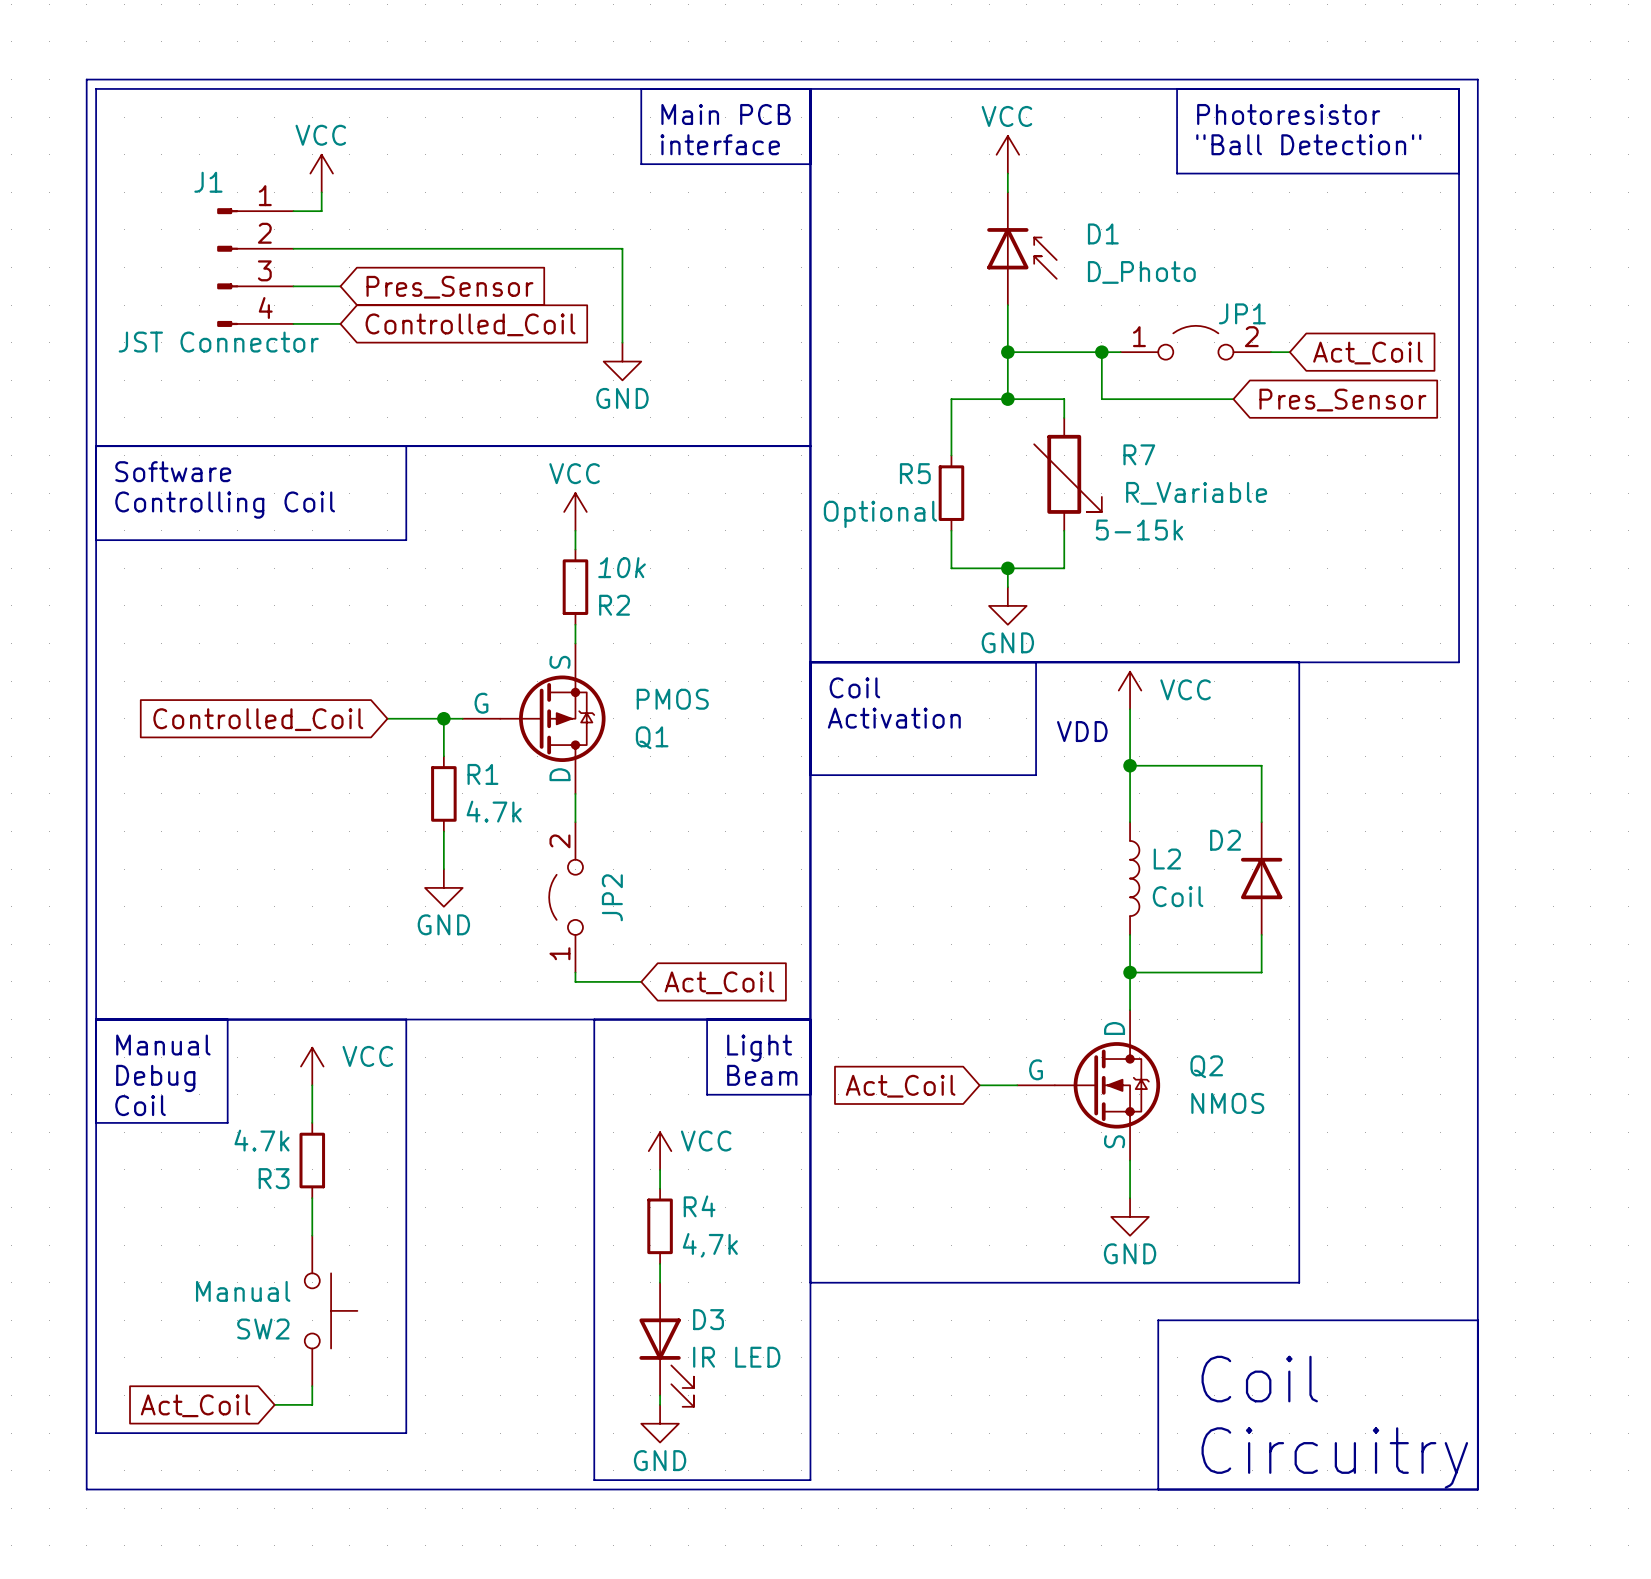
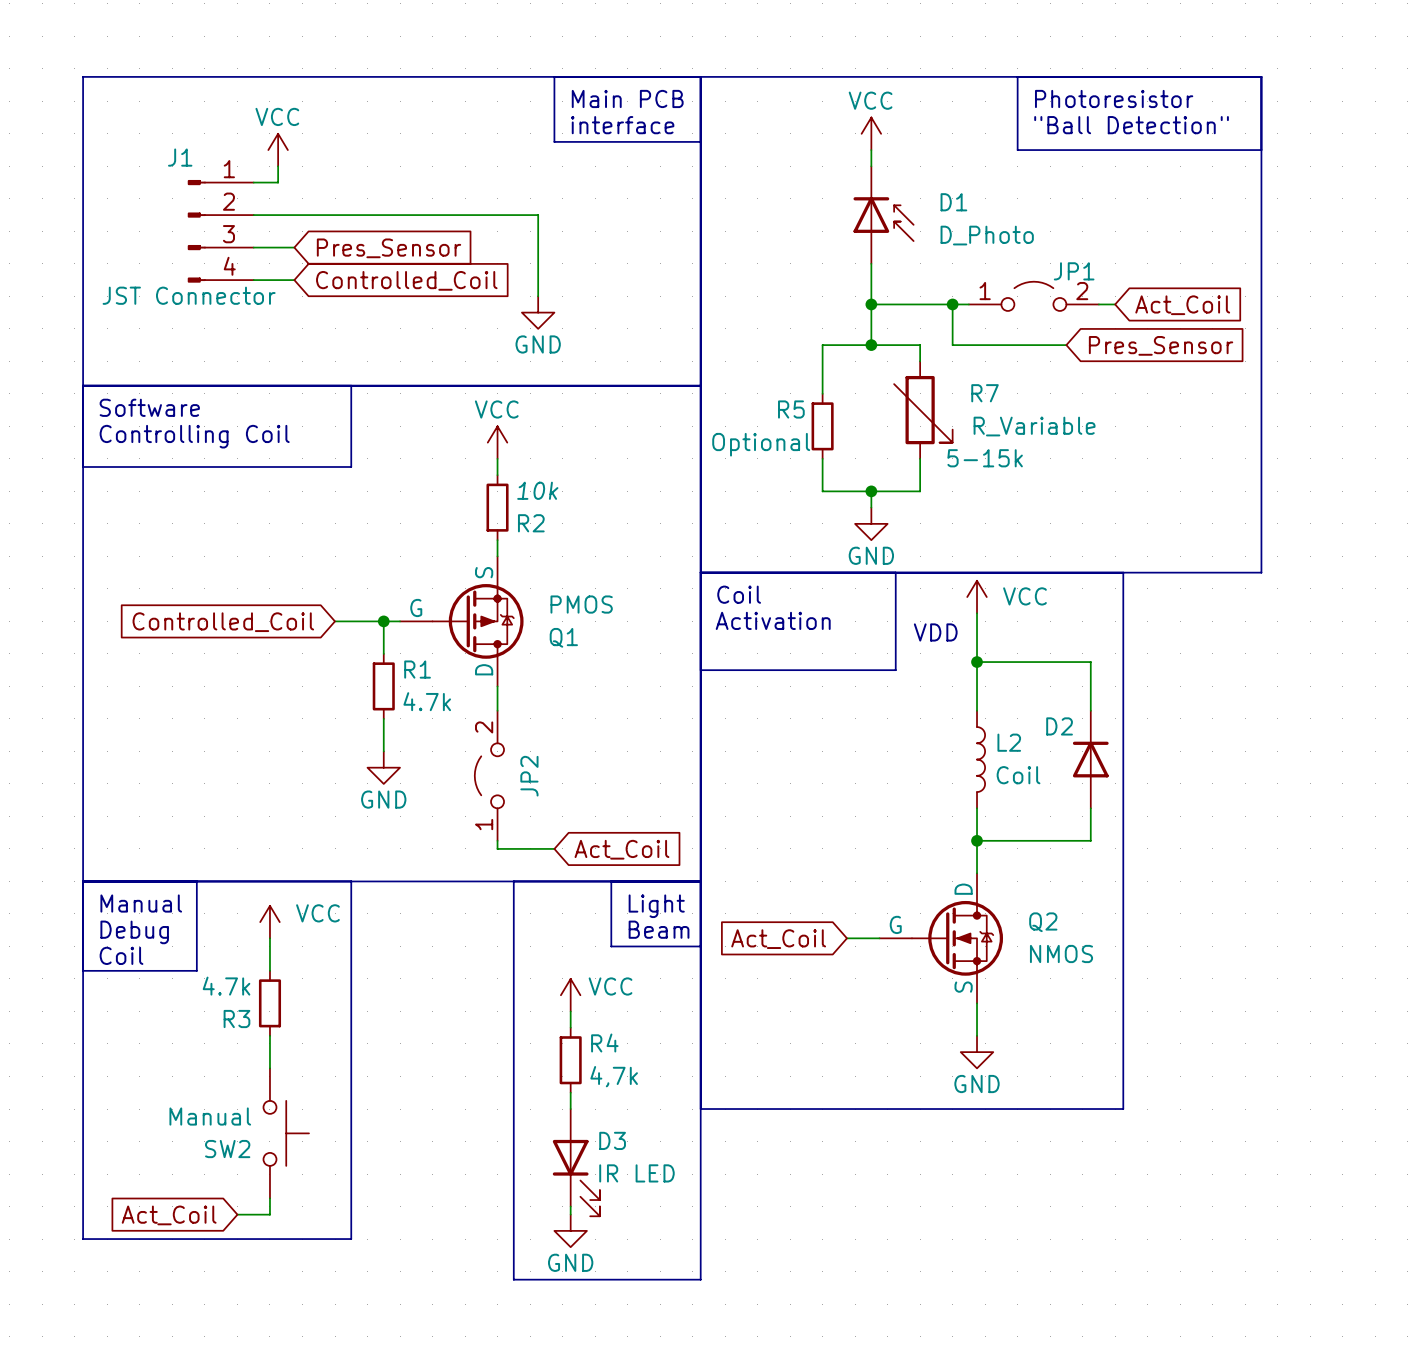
line: (86, 79) (1477, 79) (1477, 1489) (86, 1489) (86, 79) -> none
line: (1477, 1320) (1158, 1320) (1158, 1489) -> none
text: Coil (1259, 1379) -> none
text: Circuitry (1334, 1457) -> none

